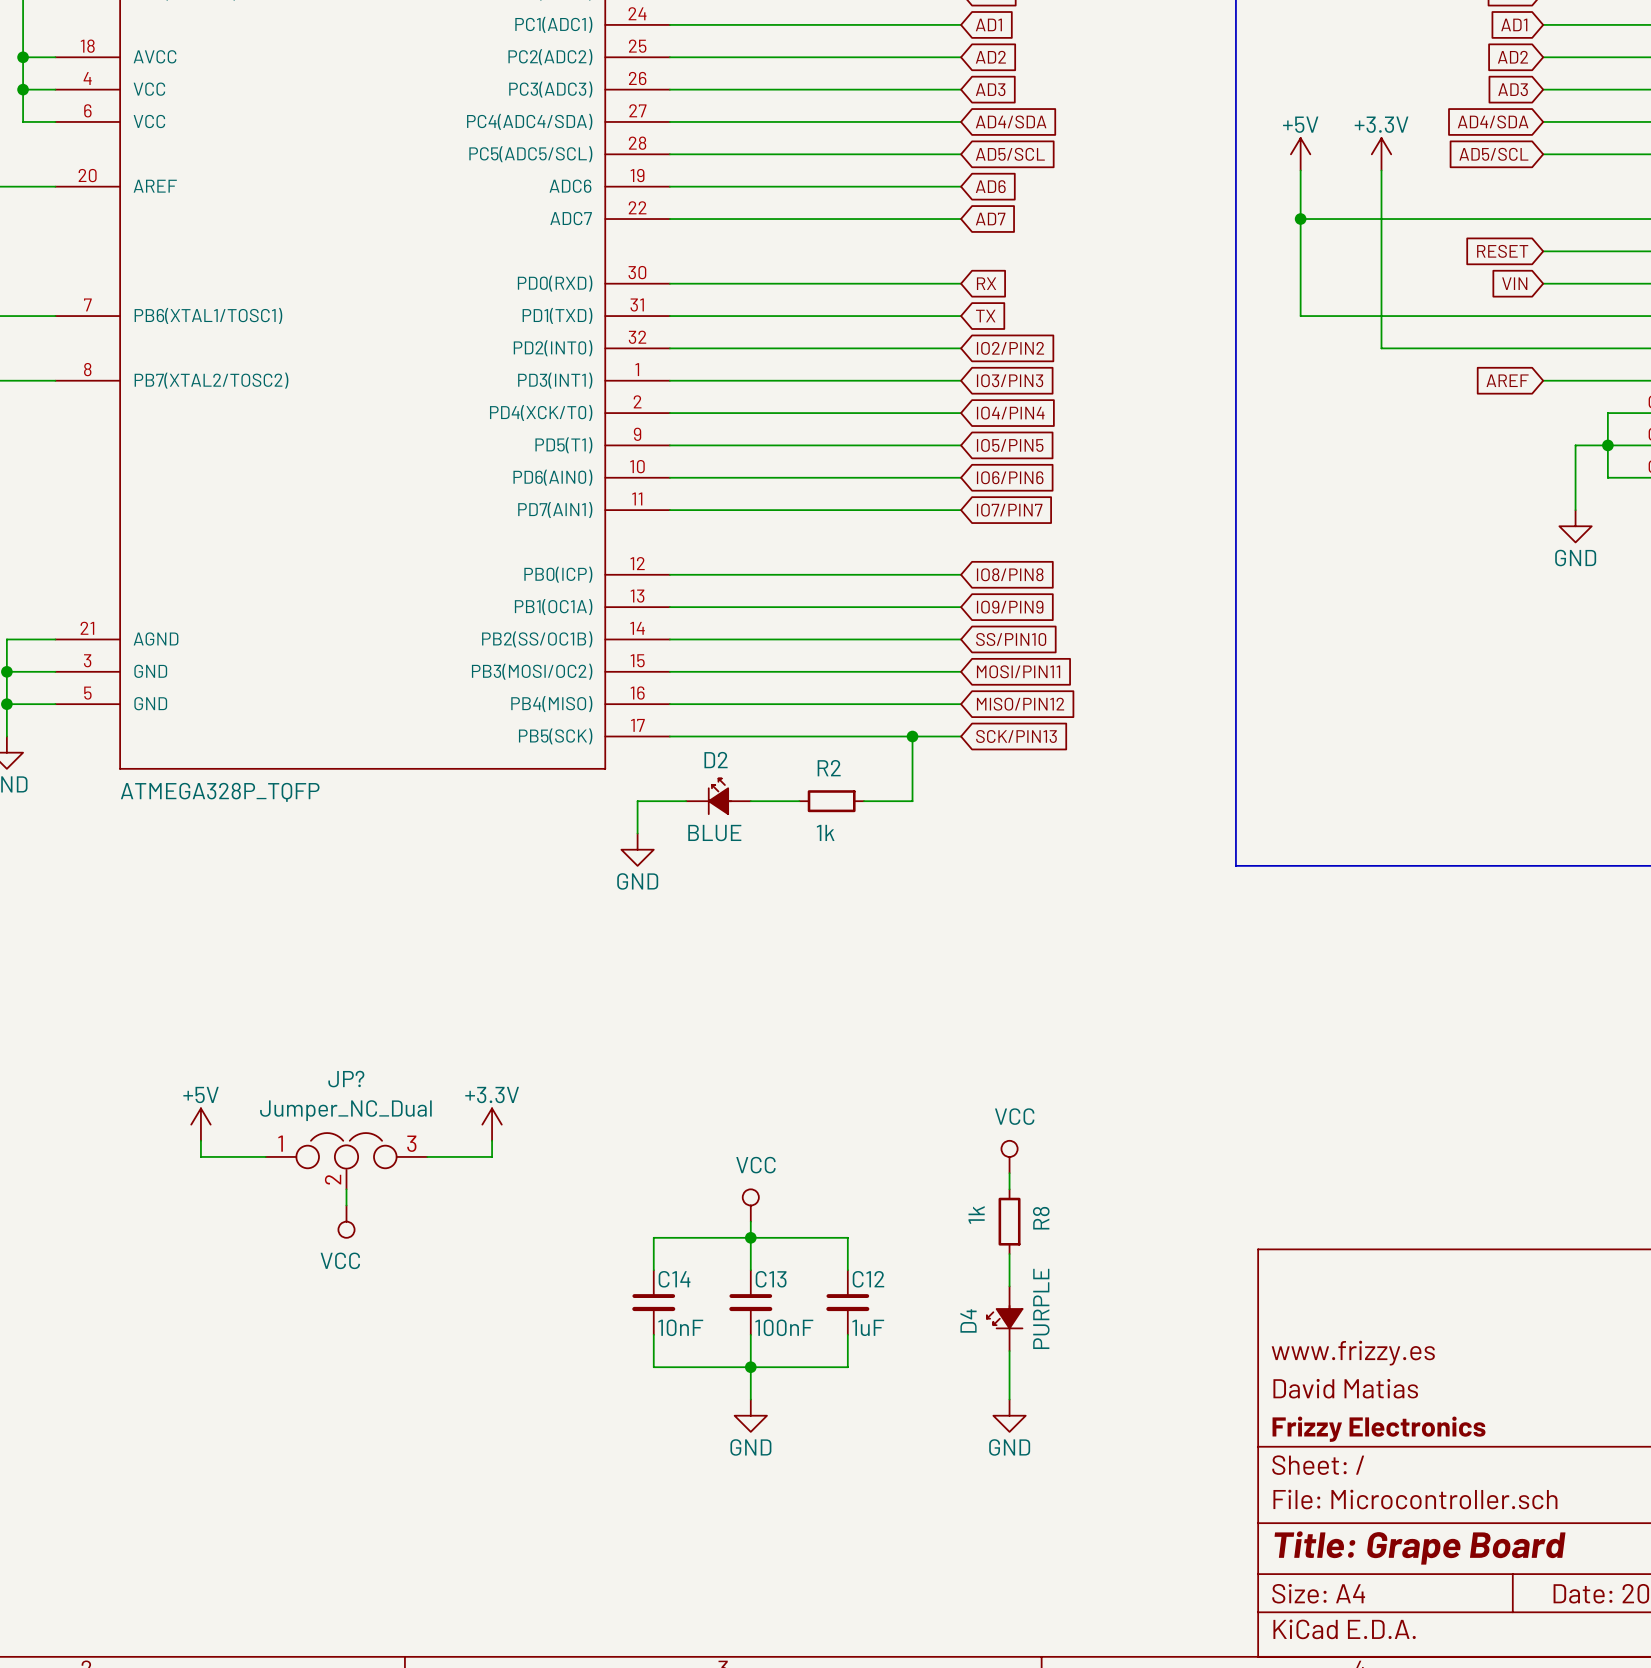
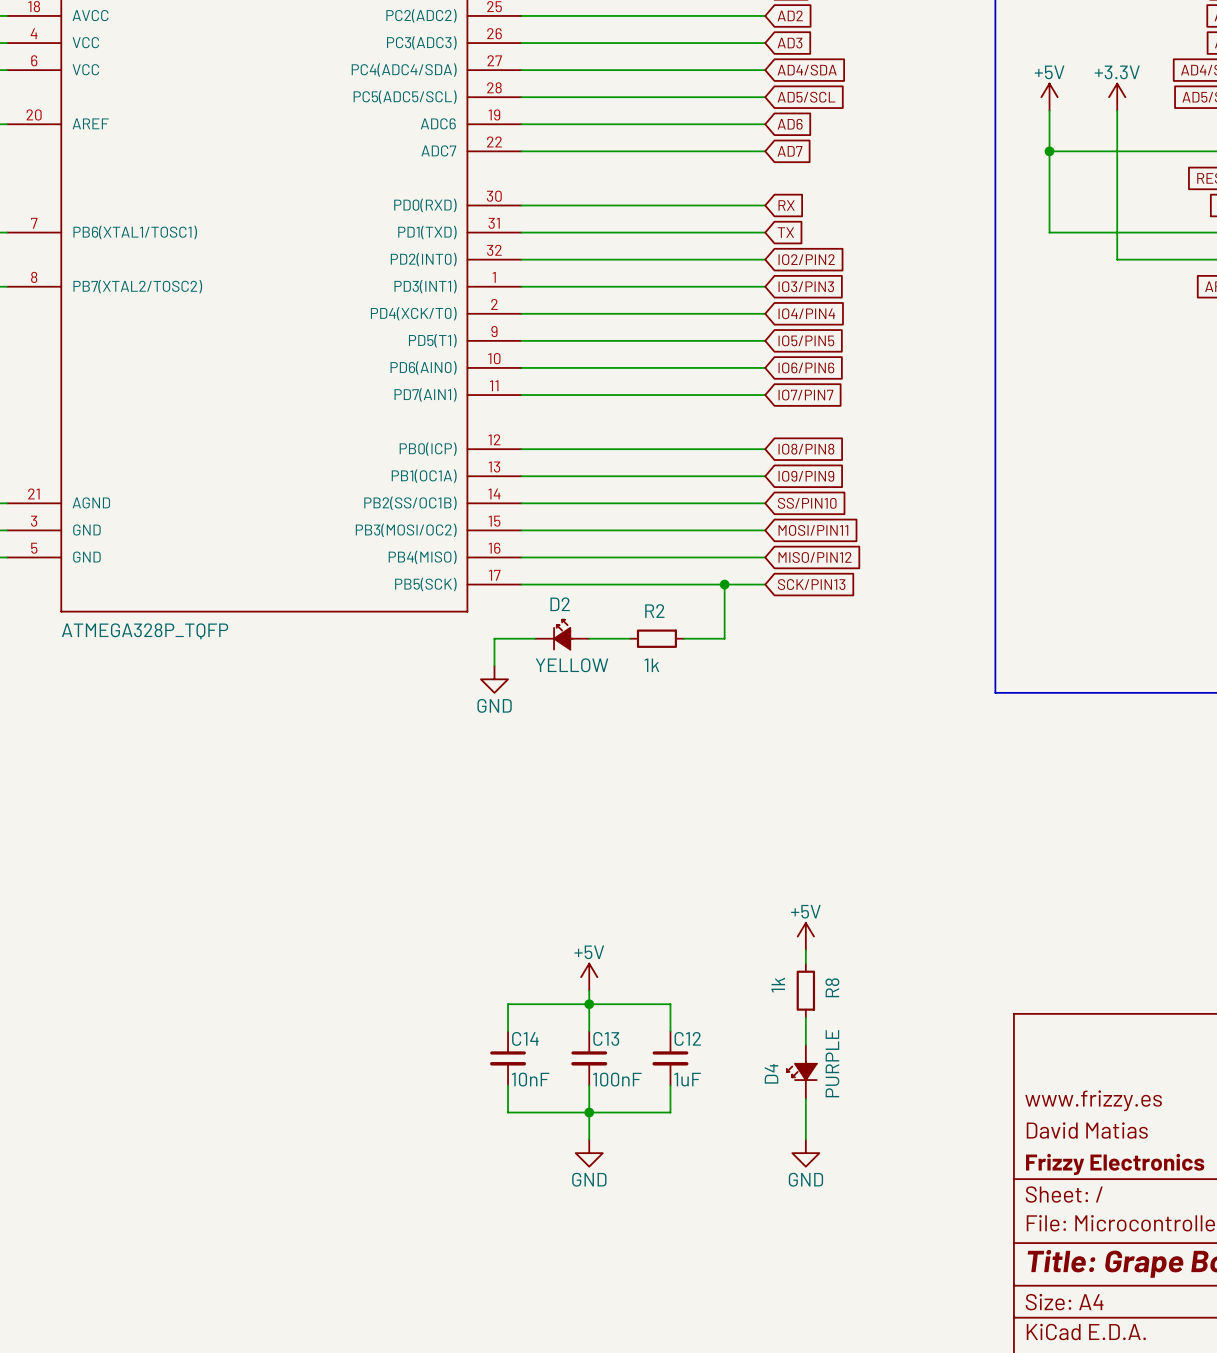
D2 value: BLUE (714, 833) -> YELLOW (572, 665)
power symbol: +5V (200, 1124) -> none
power symbol: +3.3V (492, 1124) -> none
wire: (200, 1140) (200, 1156) (265, 1156) -> none
wire: (492, 1140) (492, 1156) (427, 1156) -> none
power symbol: VCC (1009, 1156) -> +5V (805, 936)
JP?: Jumper_NC_Dual (346, 1161) -> none
wire: (346, 1189) (346, 1205) -> none
power symbol: VCC (750, 1205) -> +5V (589, 977)
power symbol: VCC (346, 1221) -> none

